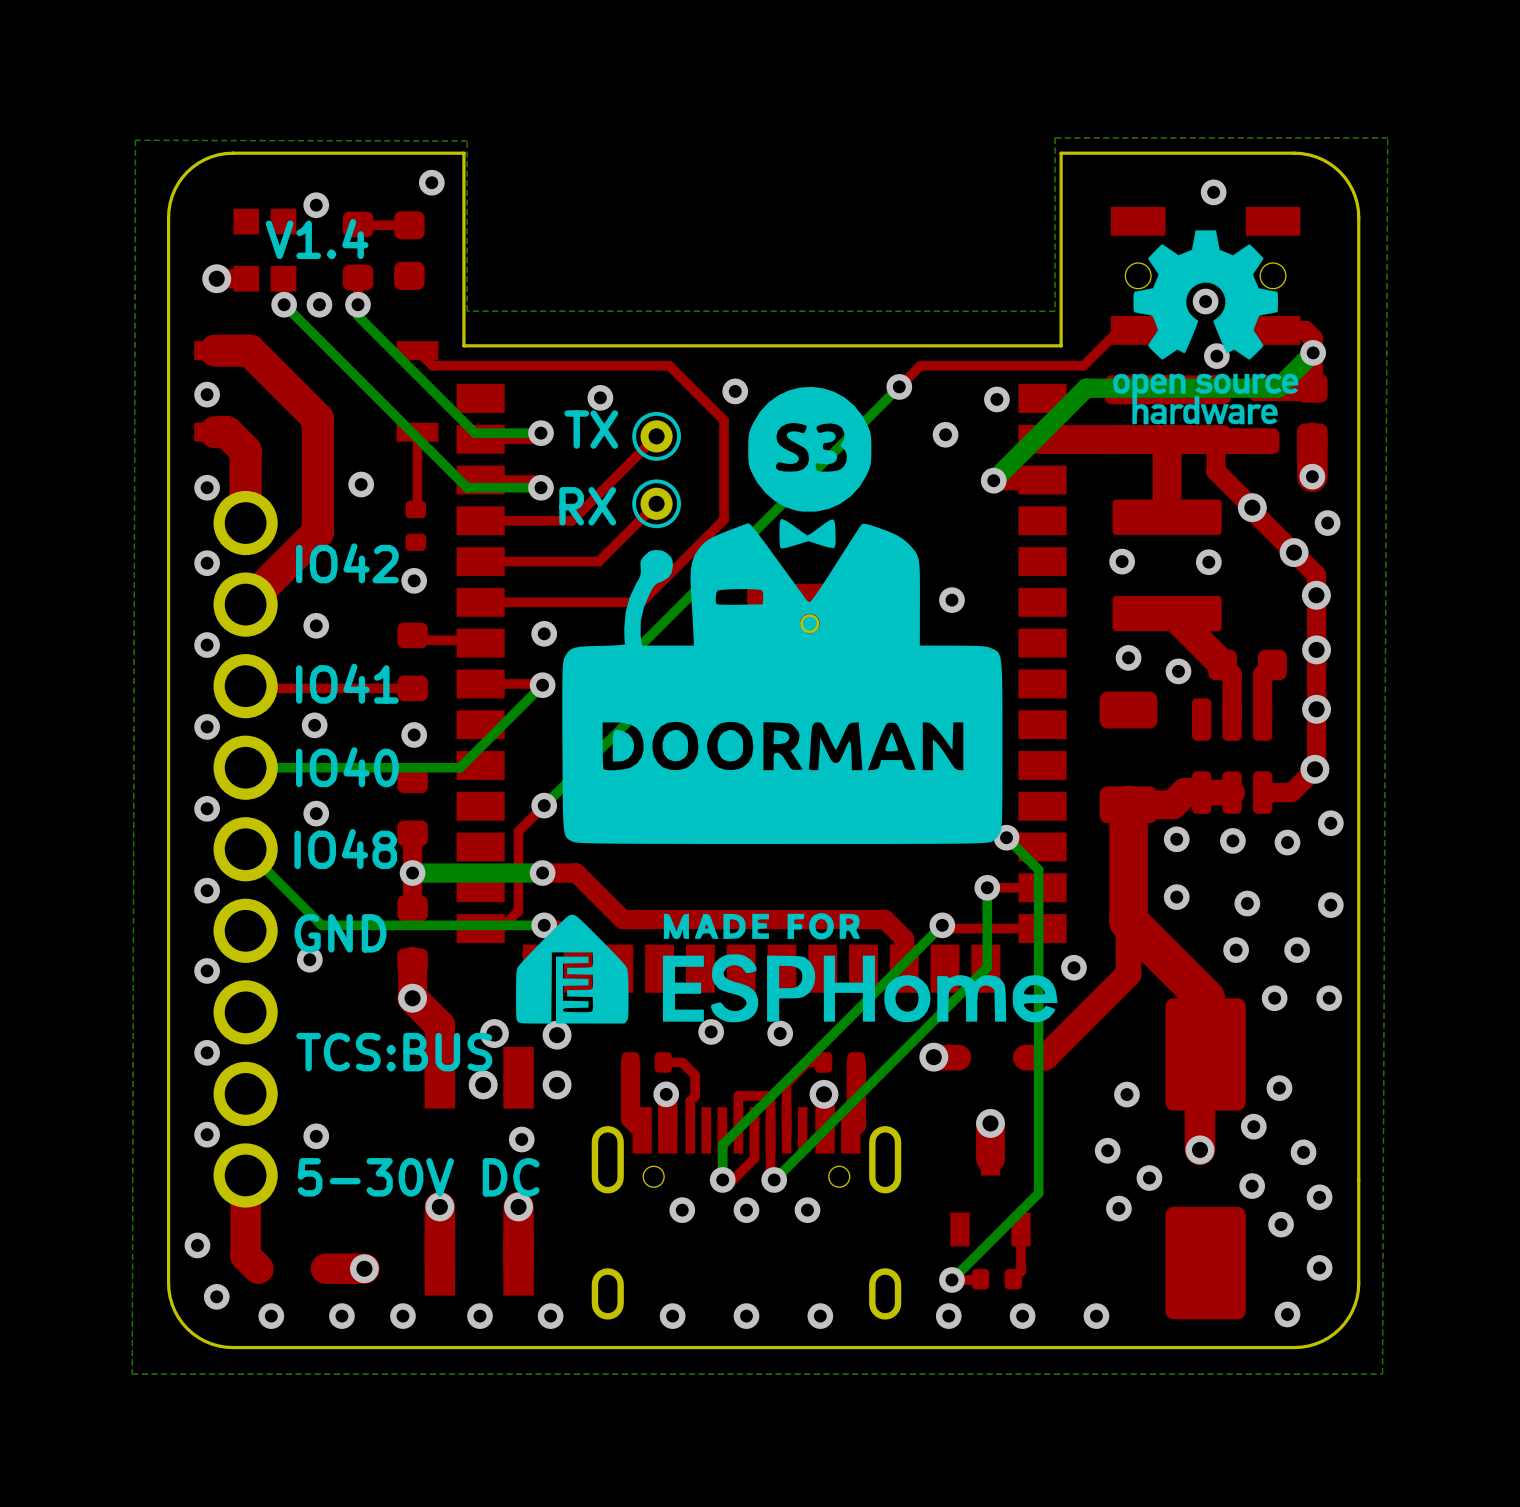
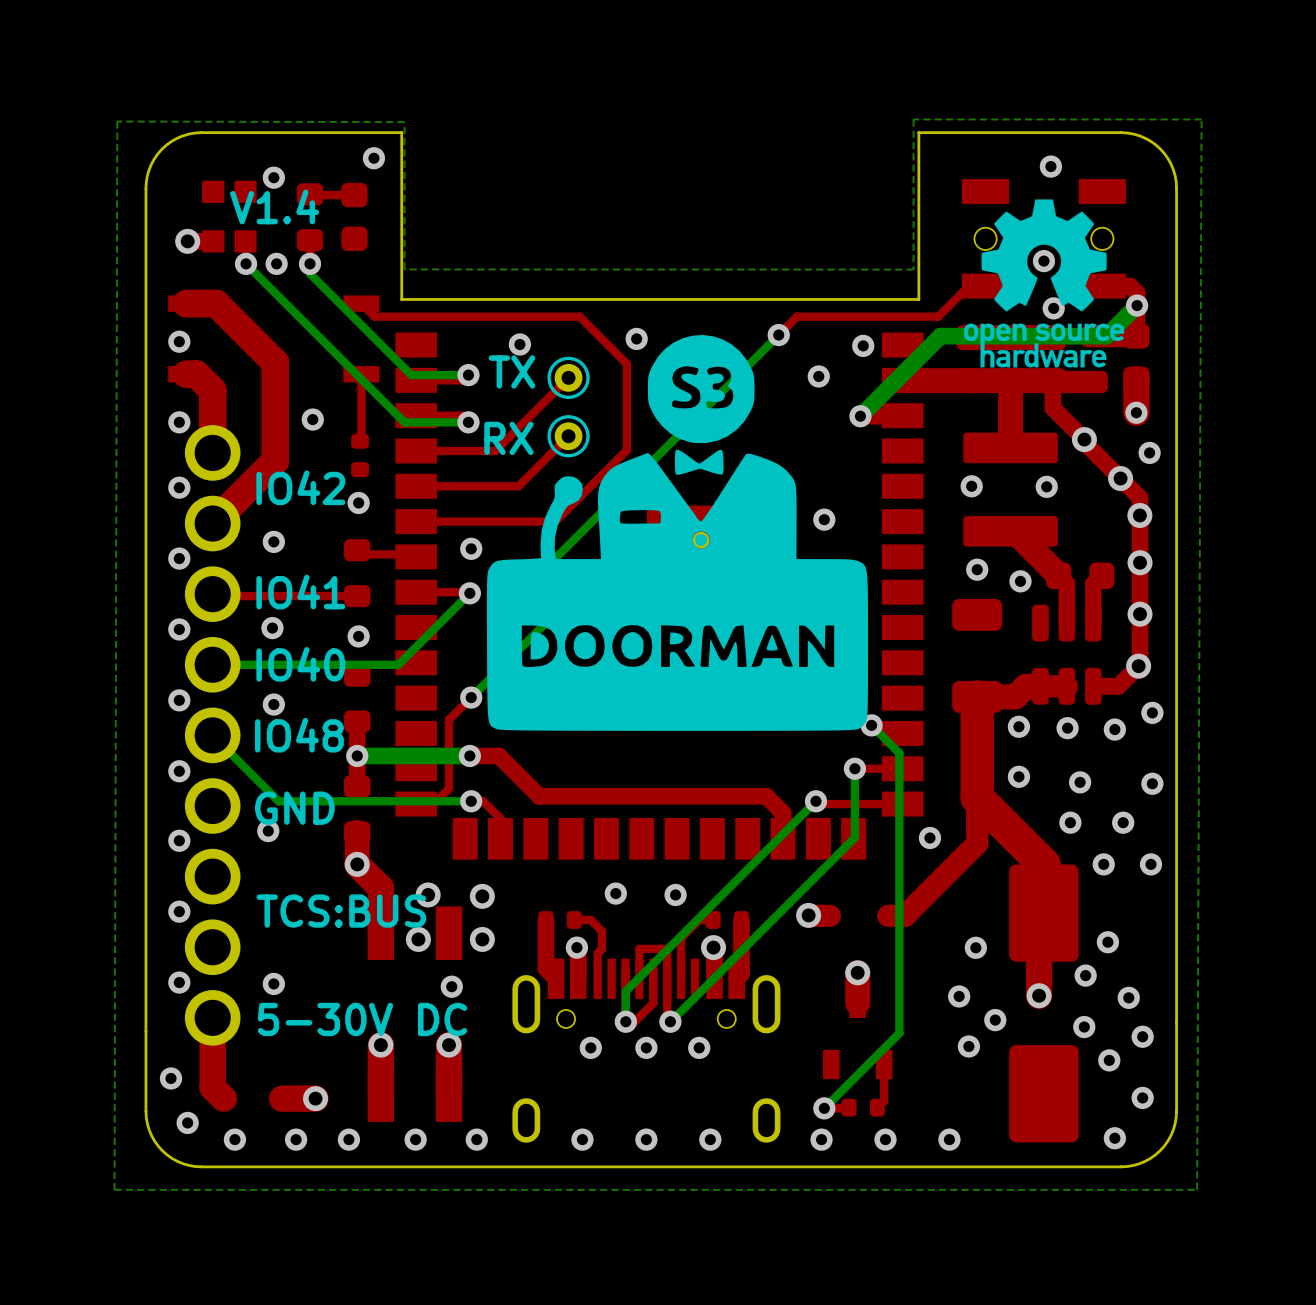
drawing: [516, 913, 1058, 1024] -> none

